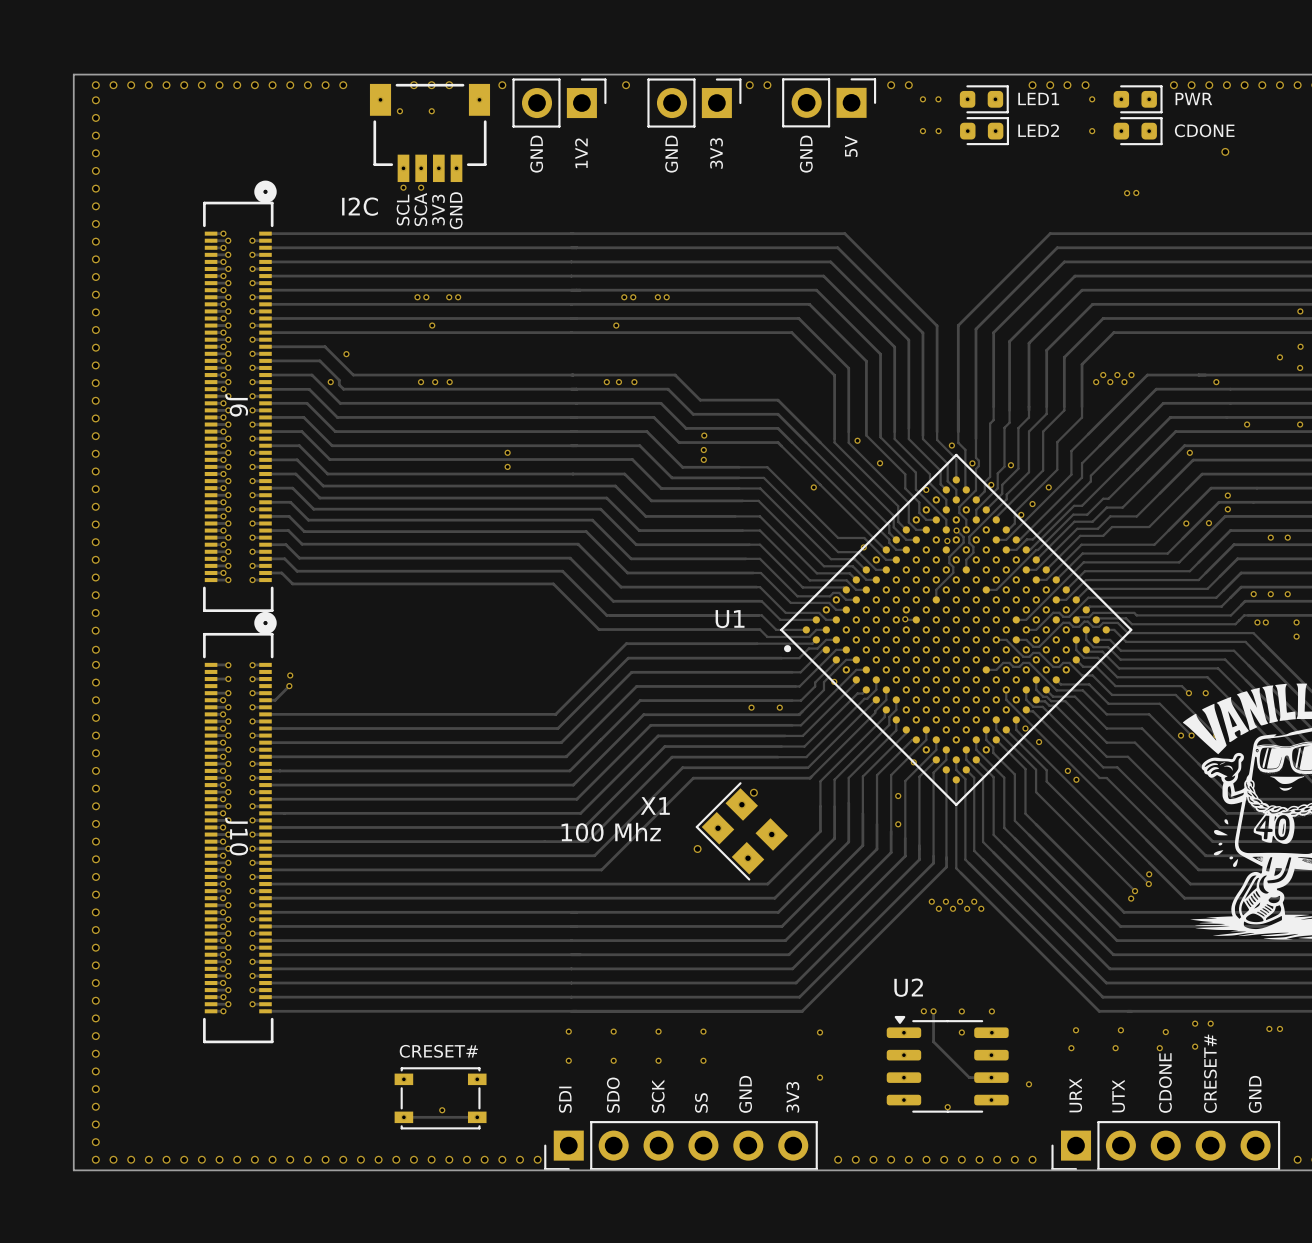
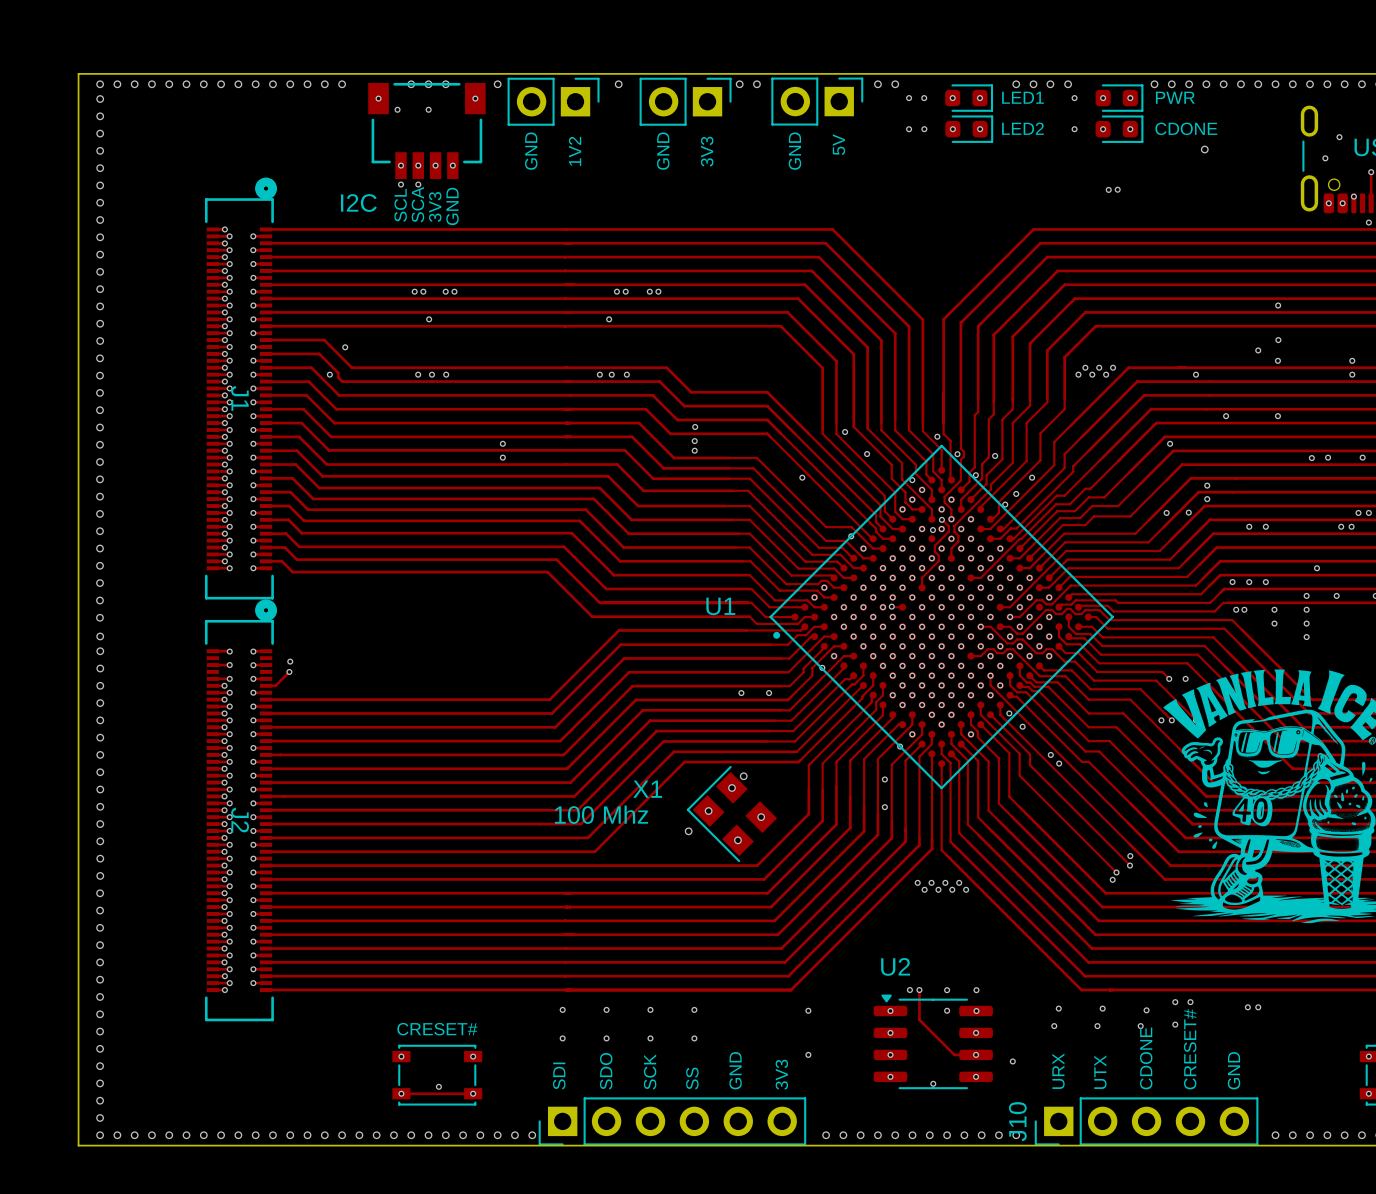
J6 name: J6 (236, 405) -> J1 (239, 398)
J10 name: J10 (236, 836) -> J2 (240, 820)
J10 name: none -> J10 (1017, 1121)

